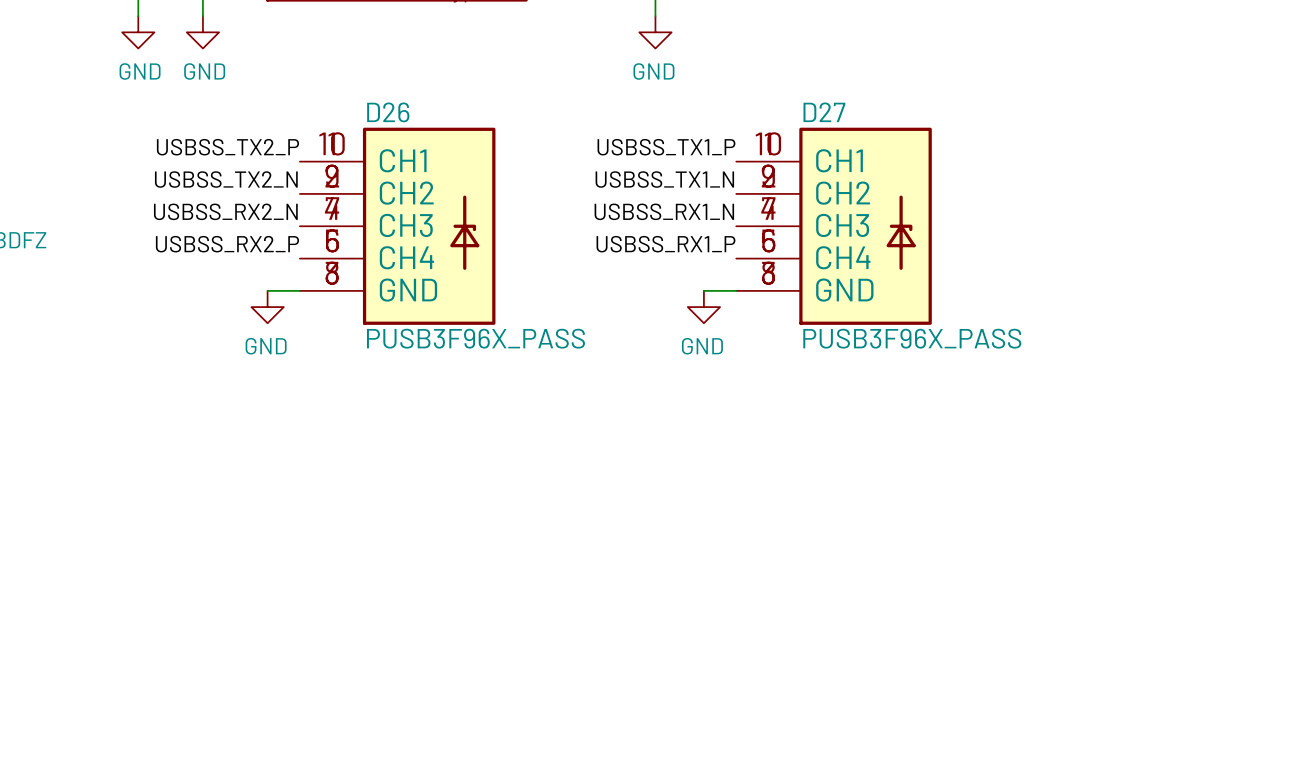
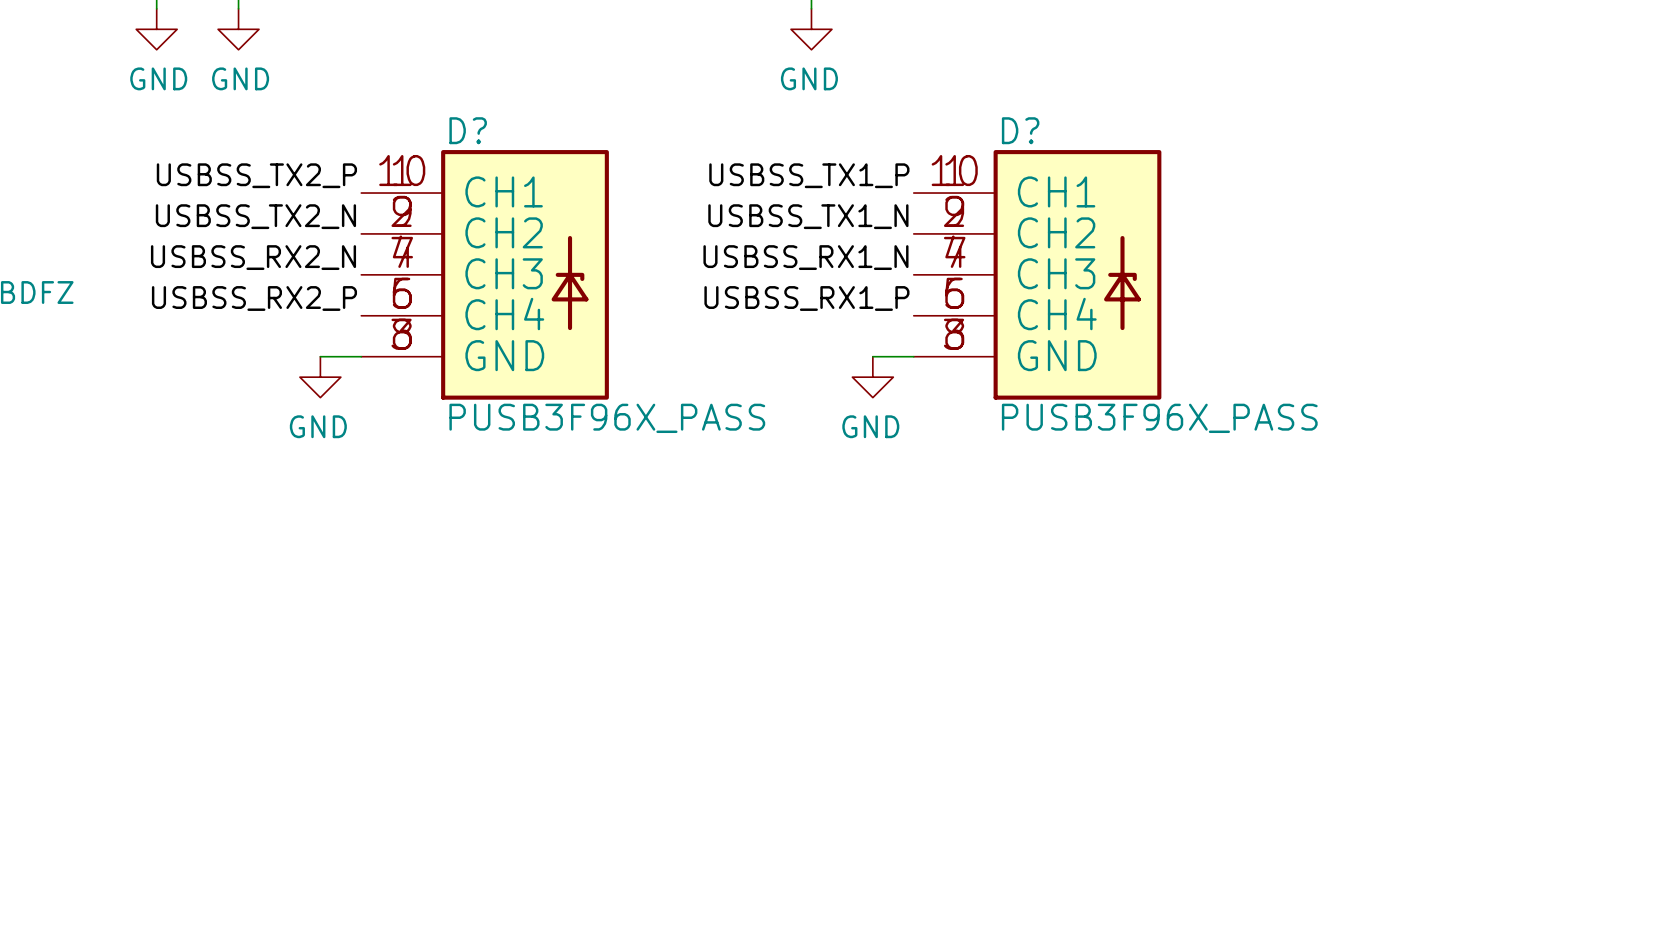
D26 name: D26 (388, 112) -> D? (468, 130)
D27 name: D27 (824, 112) -> D? (1020, 130)

